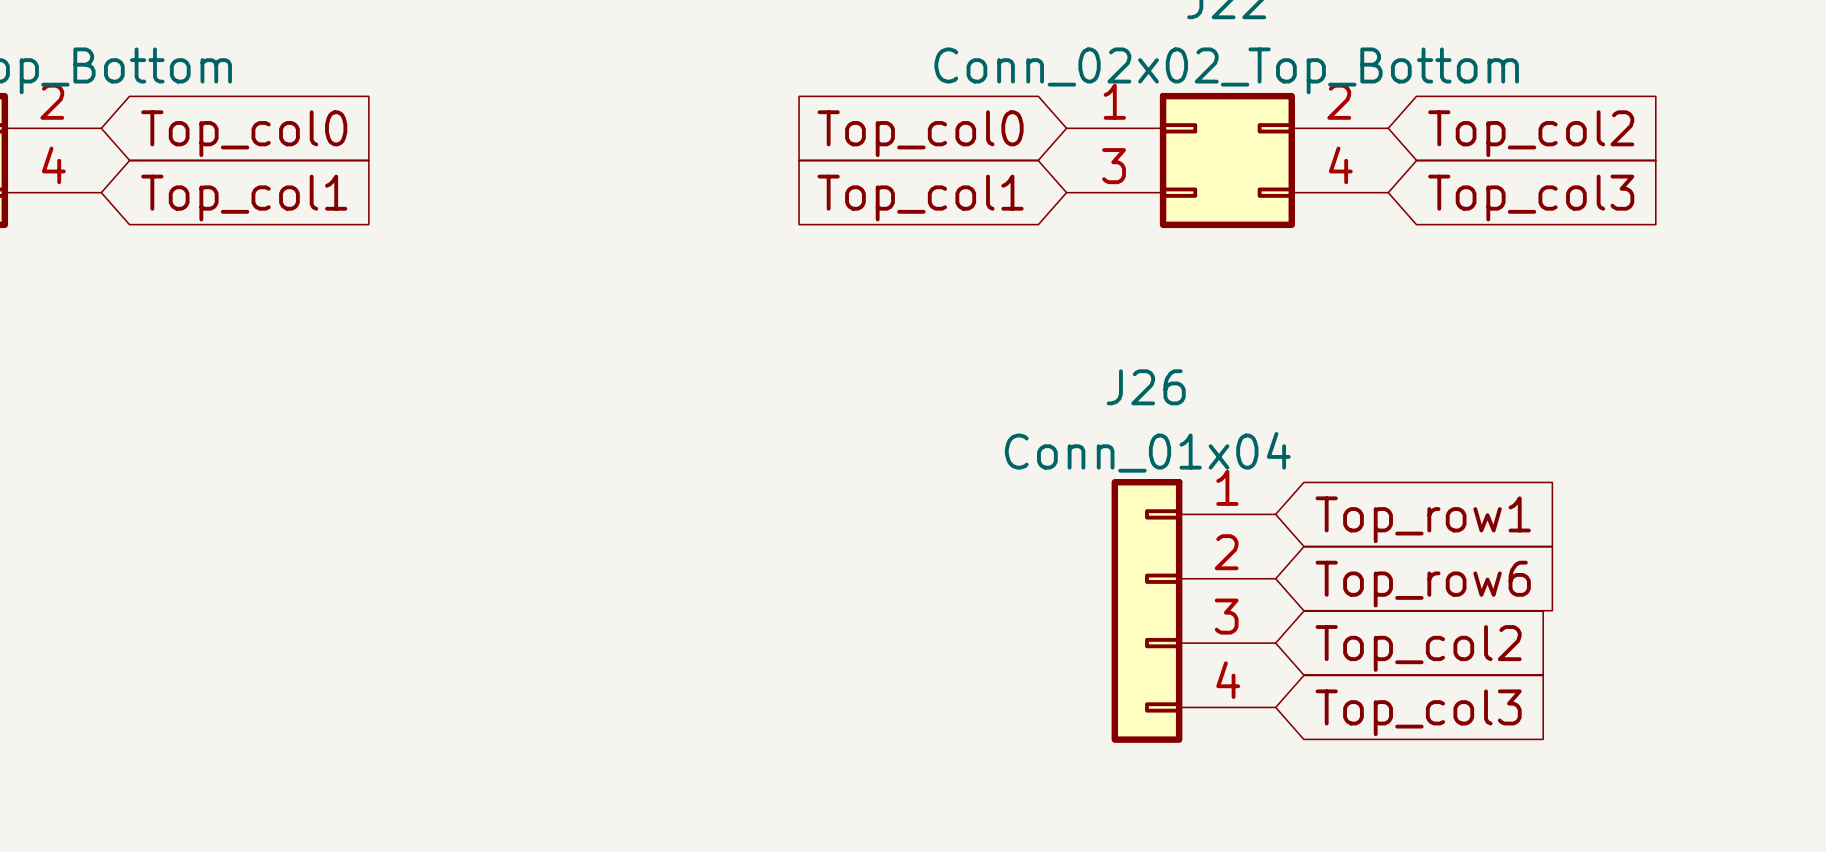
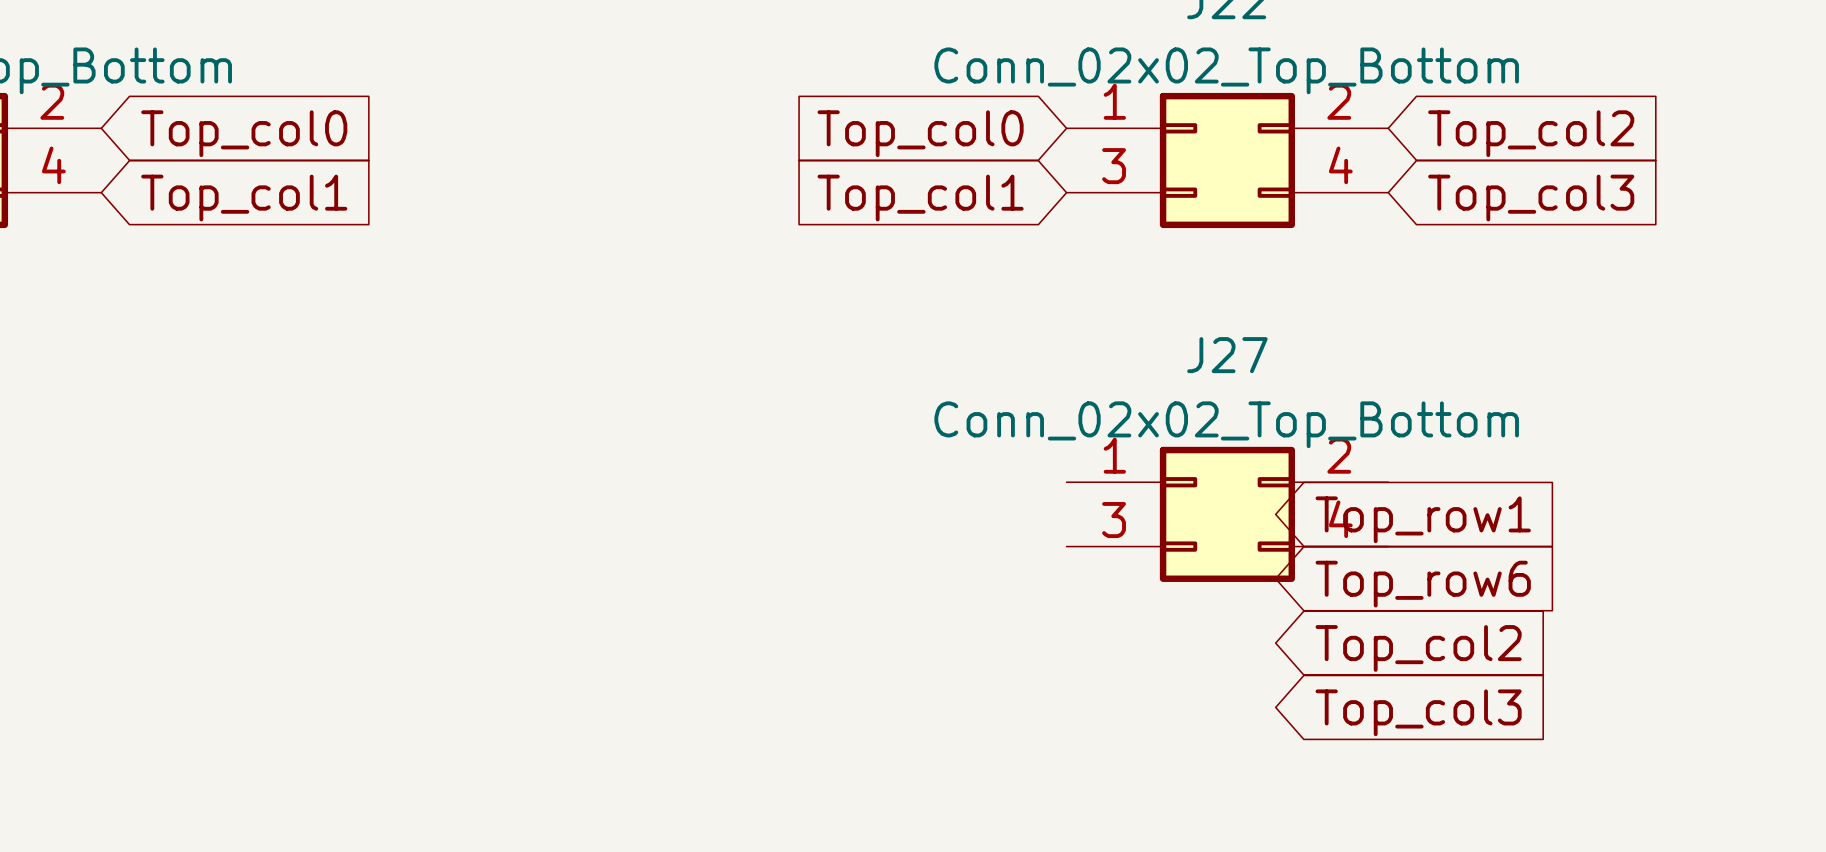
J27: none -> Conn_02x02_Top_Bottom (1227, 514)
J26: Conn_01x04 (1193, 610) -> none

